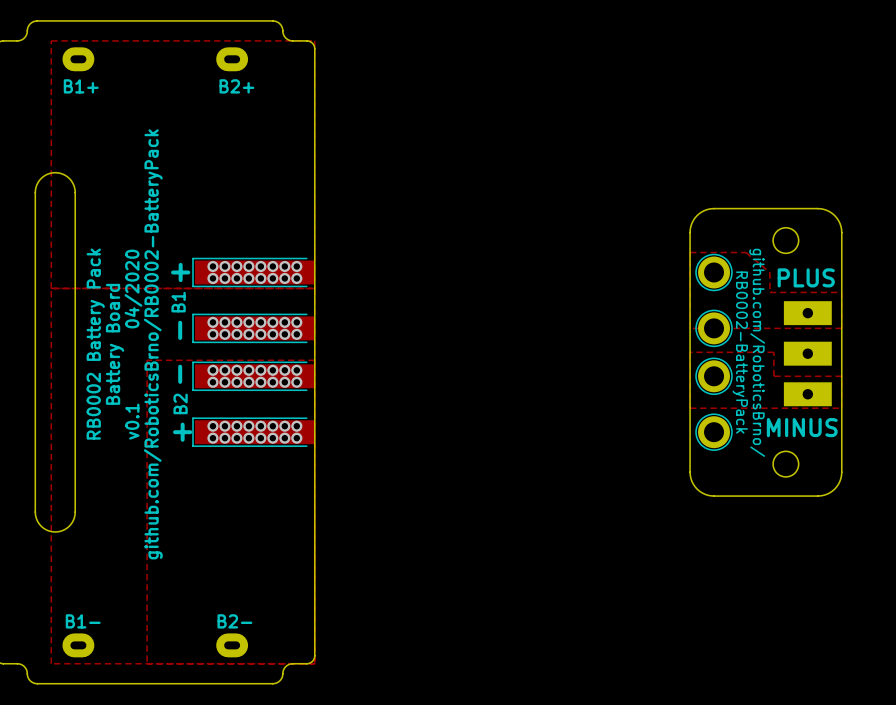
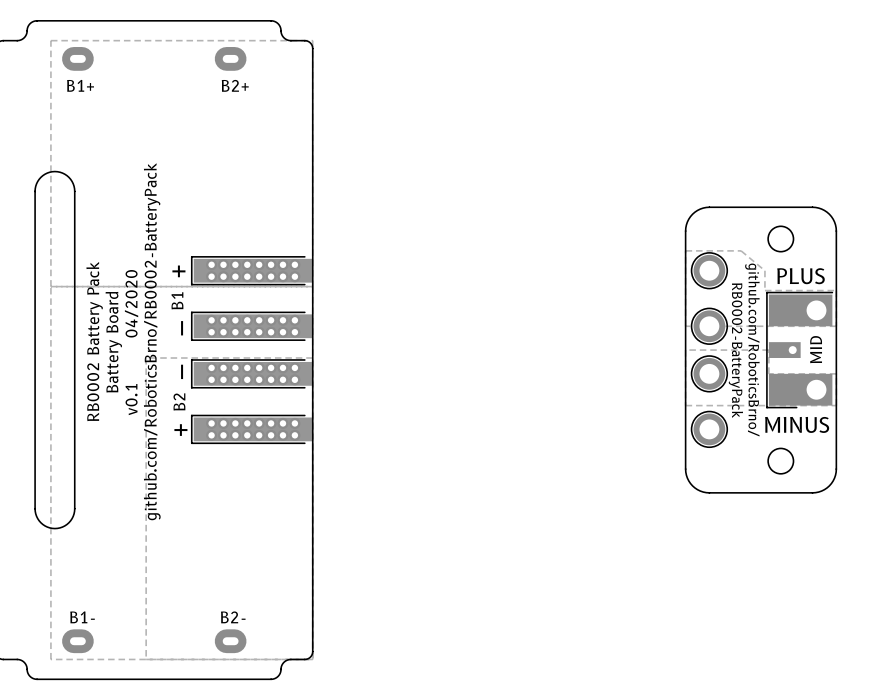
part footprint: [783, 301, 832, 407] -> [766, 291, 833, 409]
text: none -> MID (816, 349)

